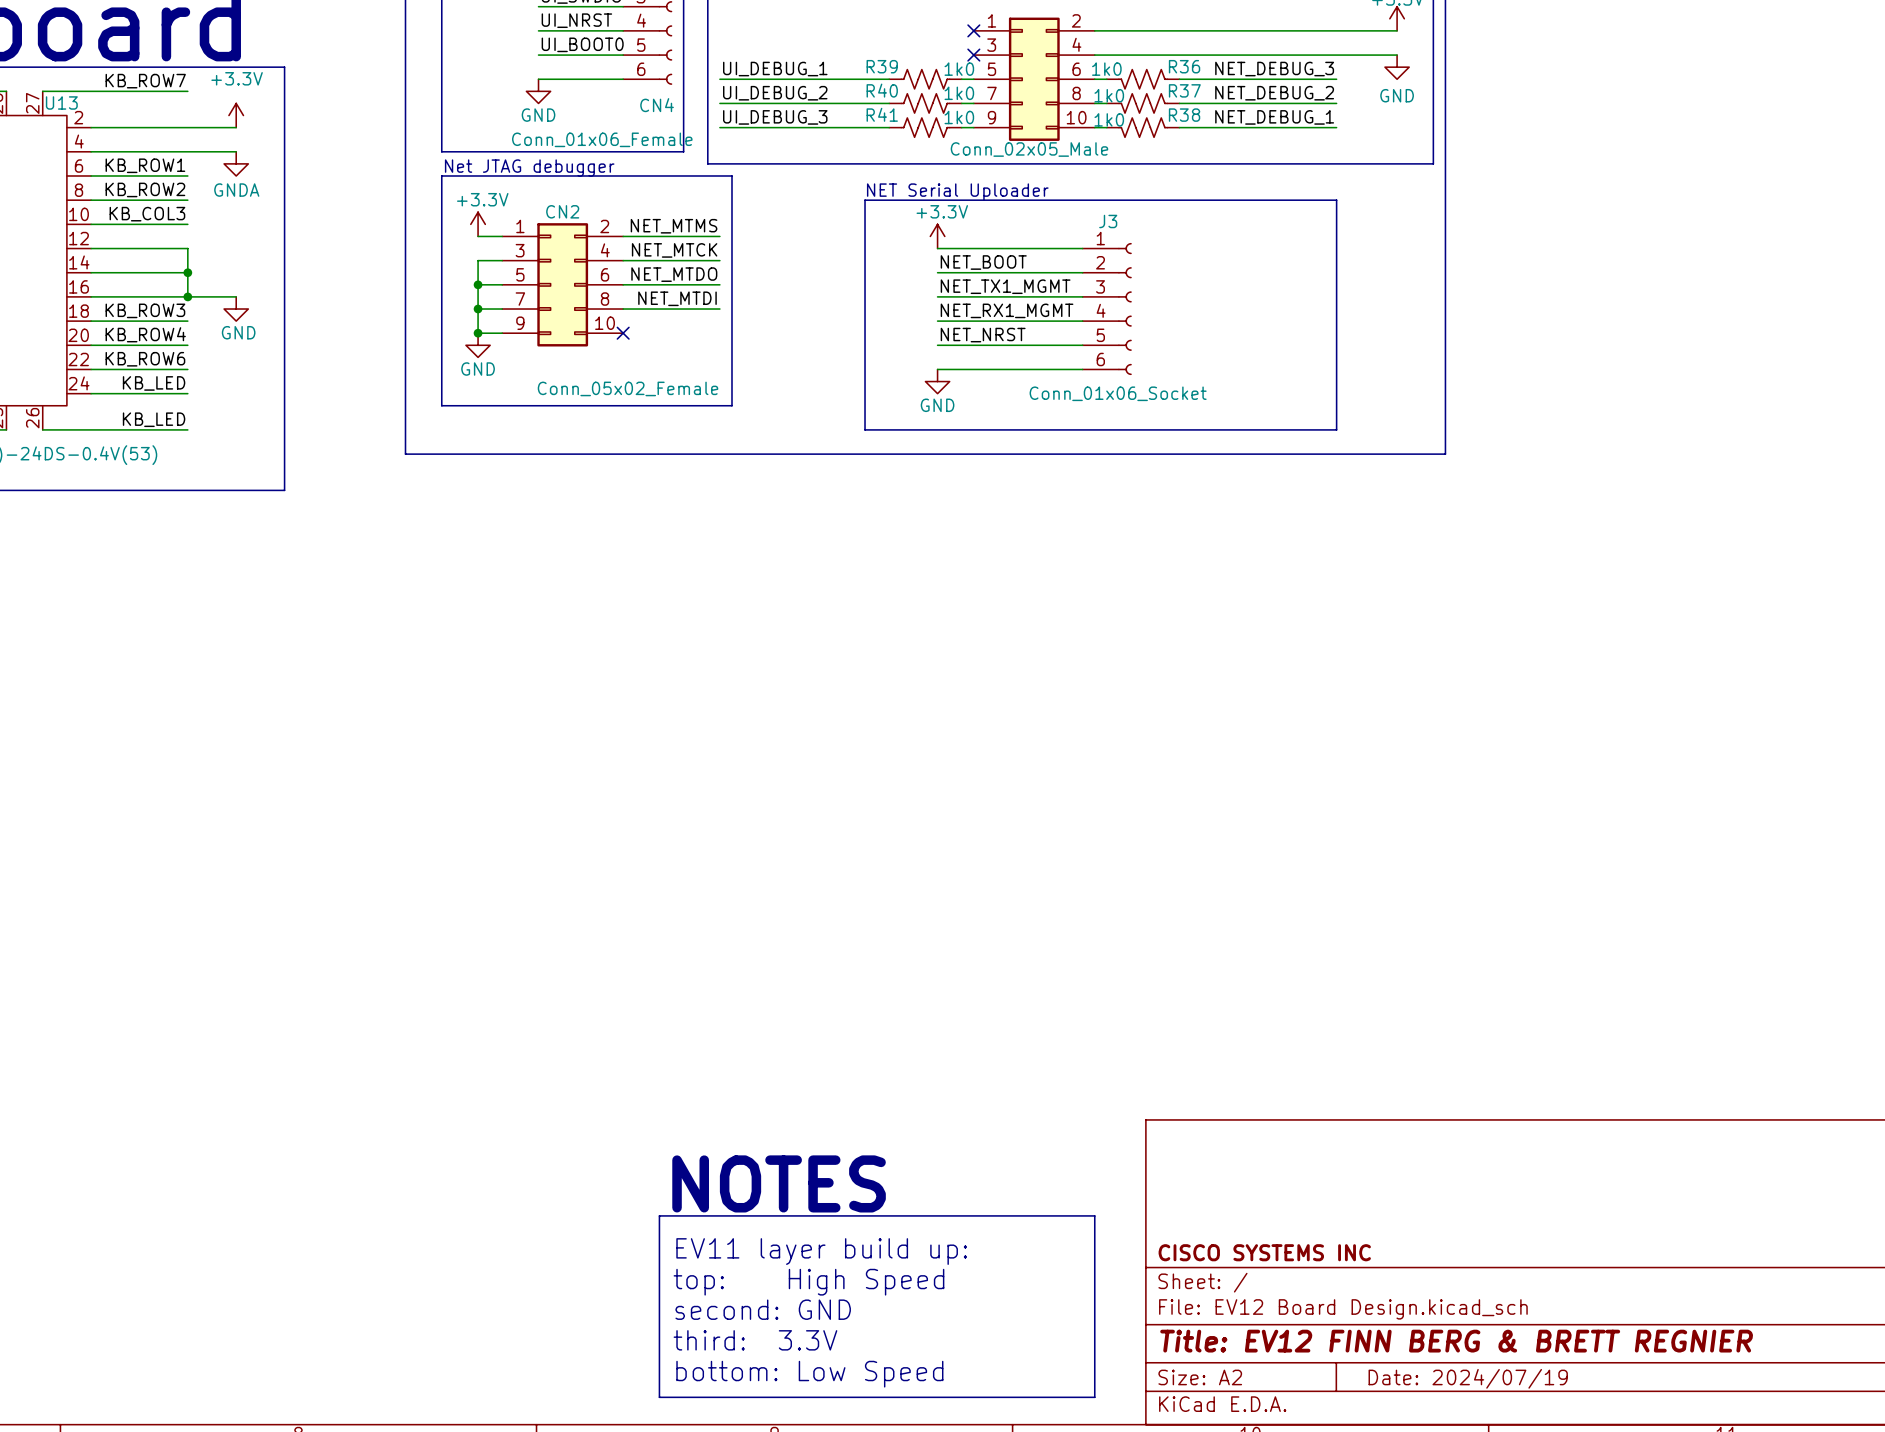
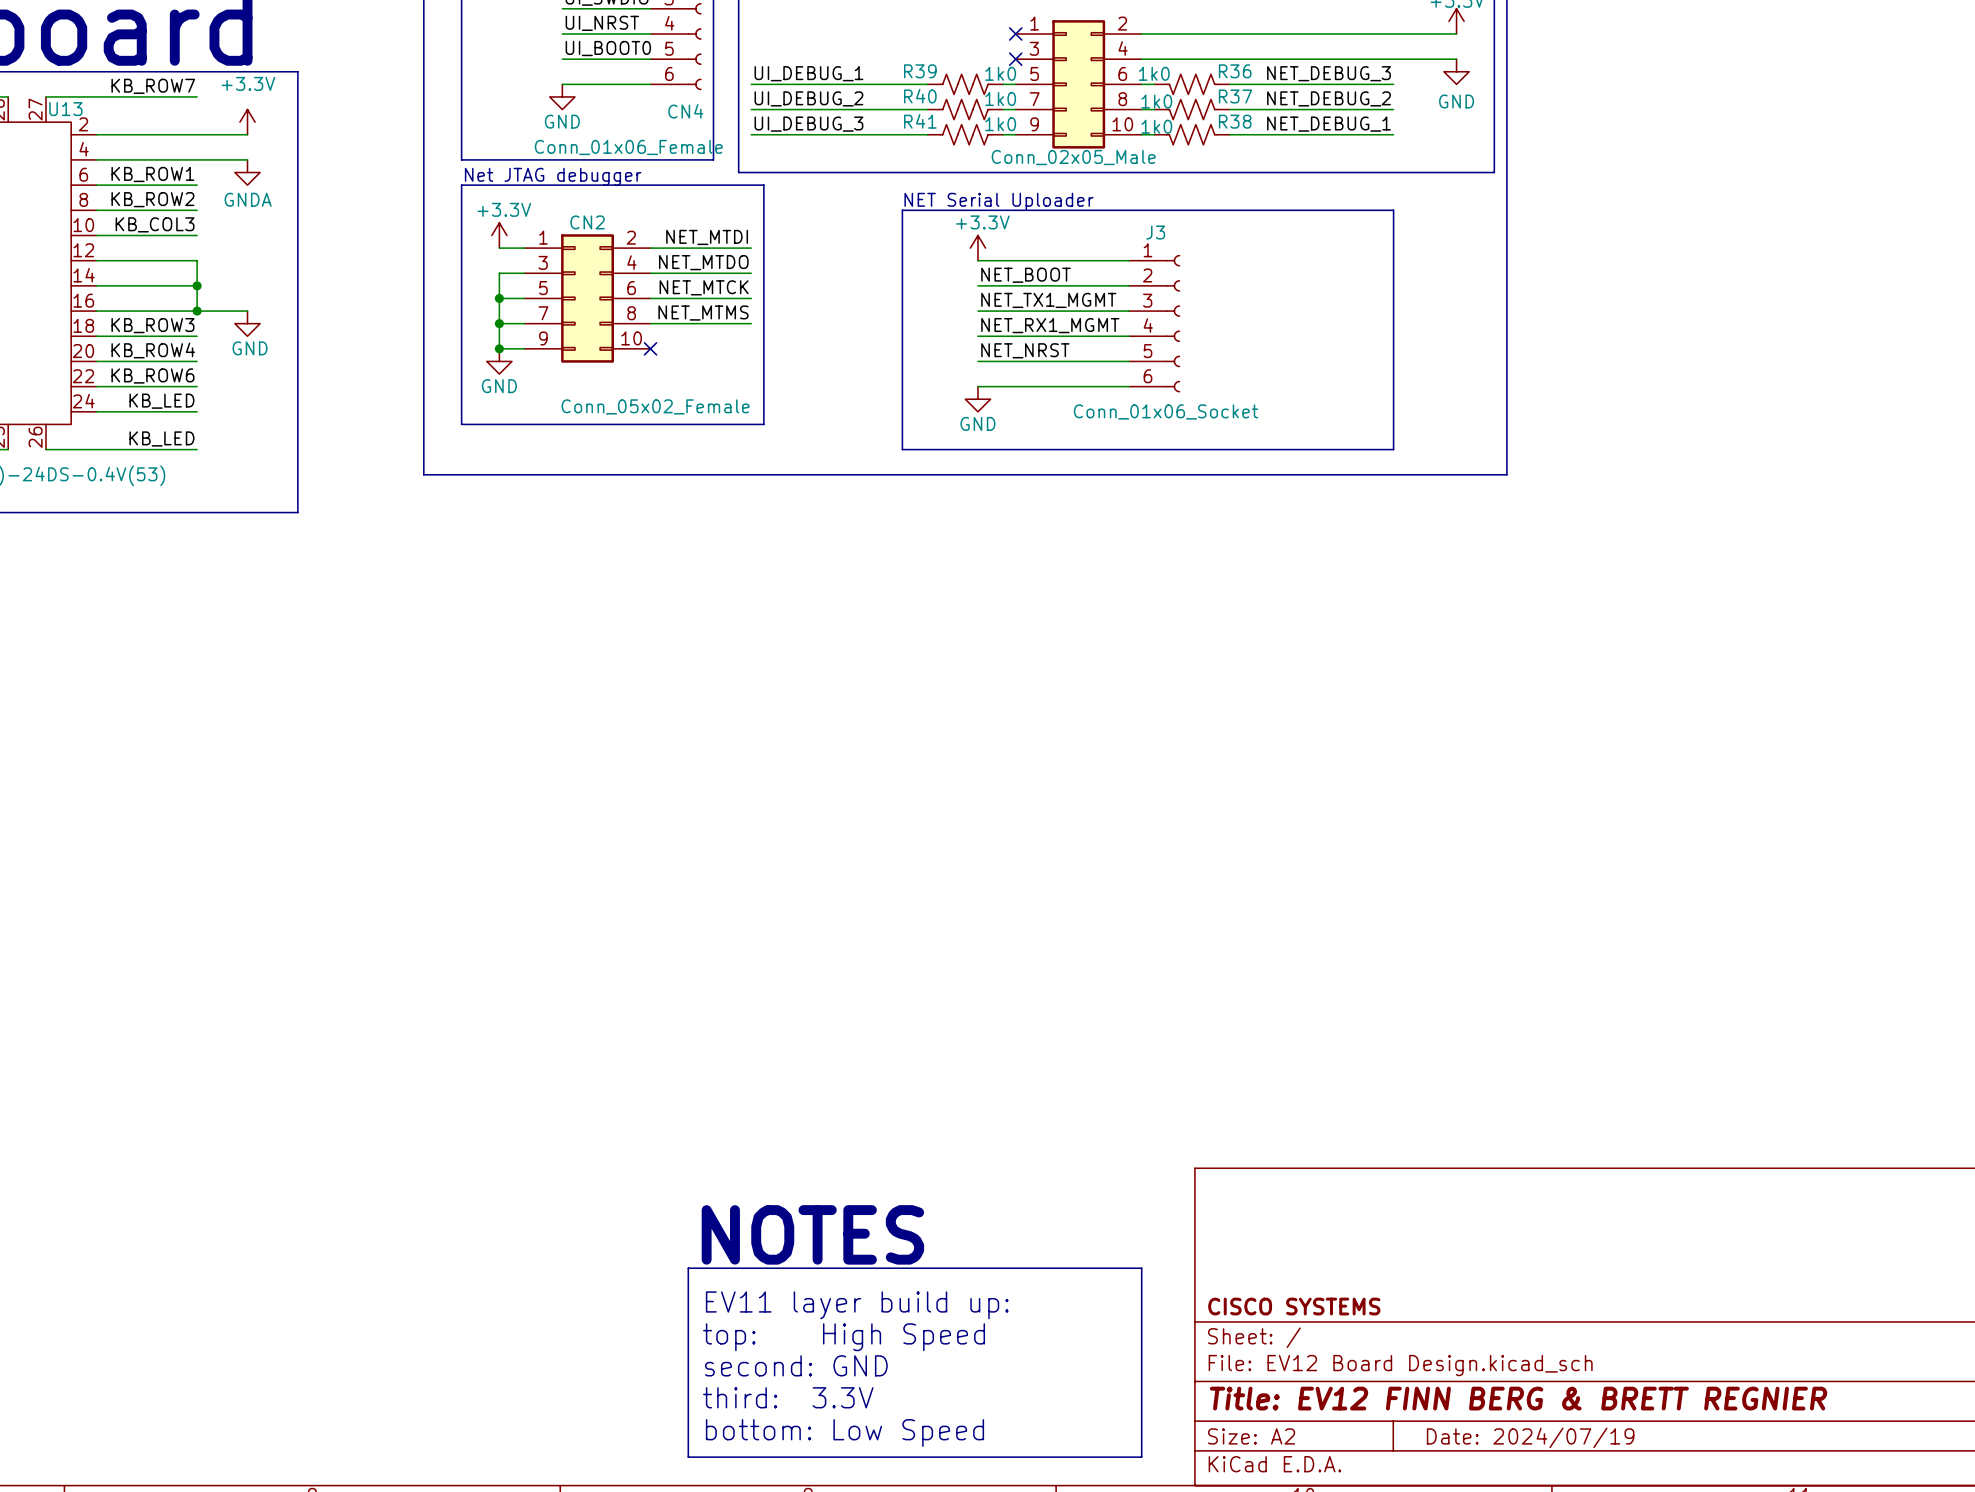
label: NET_MTMS (674, 226) -> NET_MTDI (707, 237)
label: NET_MTCK (674, 250) -> NET_MTDO (703, 262)
label: NET_MTDO (674, 274) -> NET_MTCK (704, 287)
label: NET_MTDI (677, 298) -> NET_MTMS (703, 313)
title block: CISCO SYSTEMS INC (1264, 1252) -> CISCO SYSTEMS (1294, 1306)

